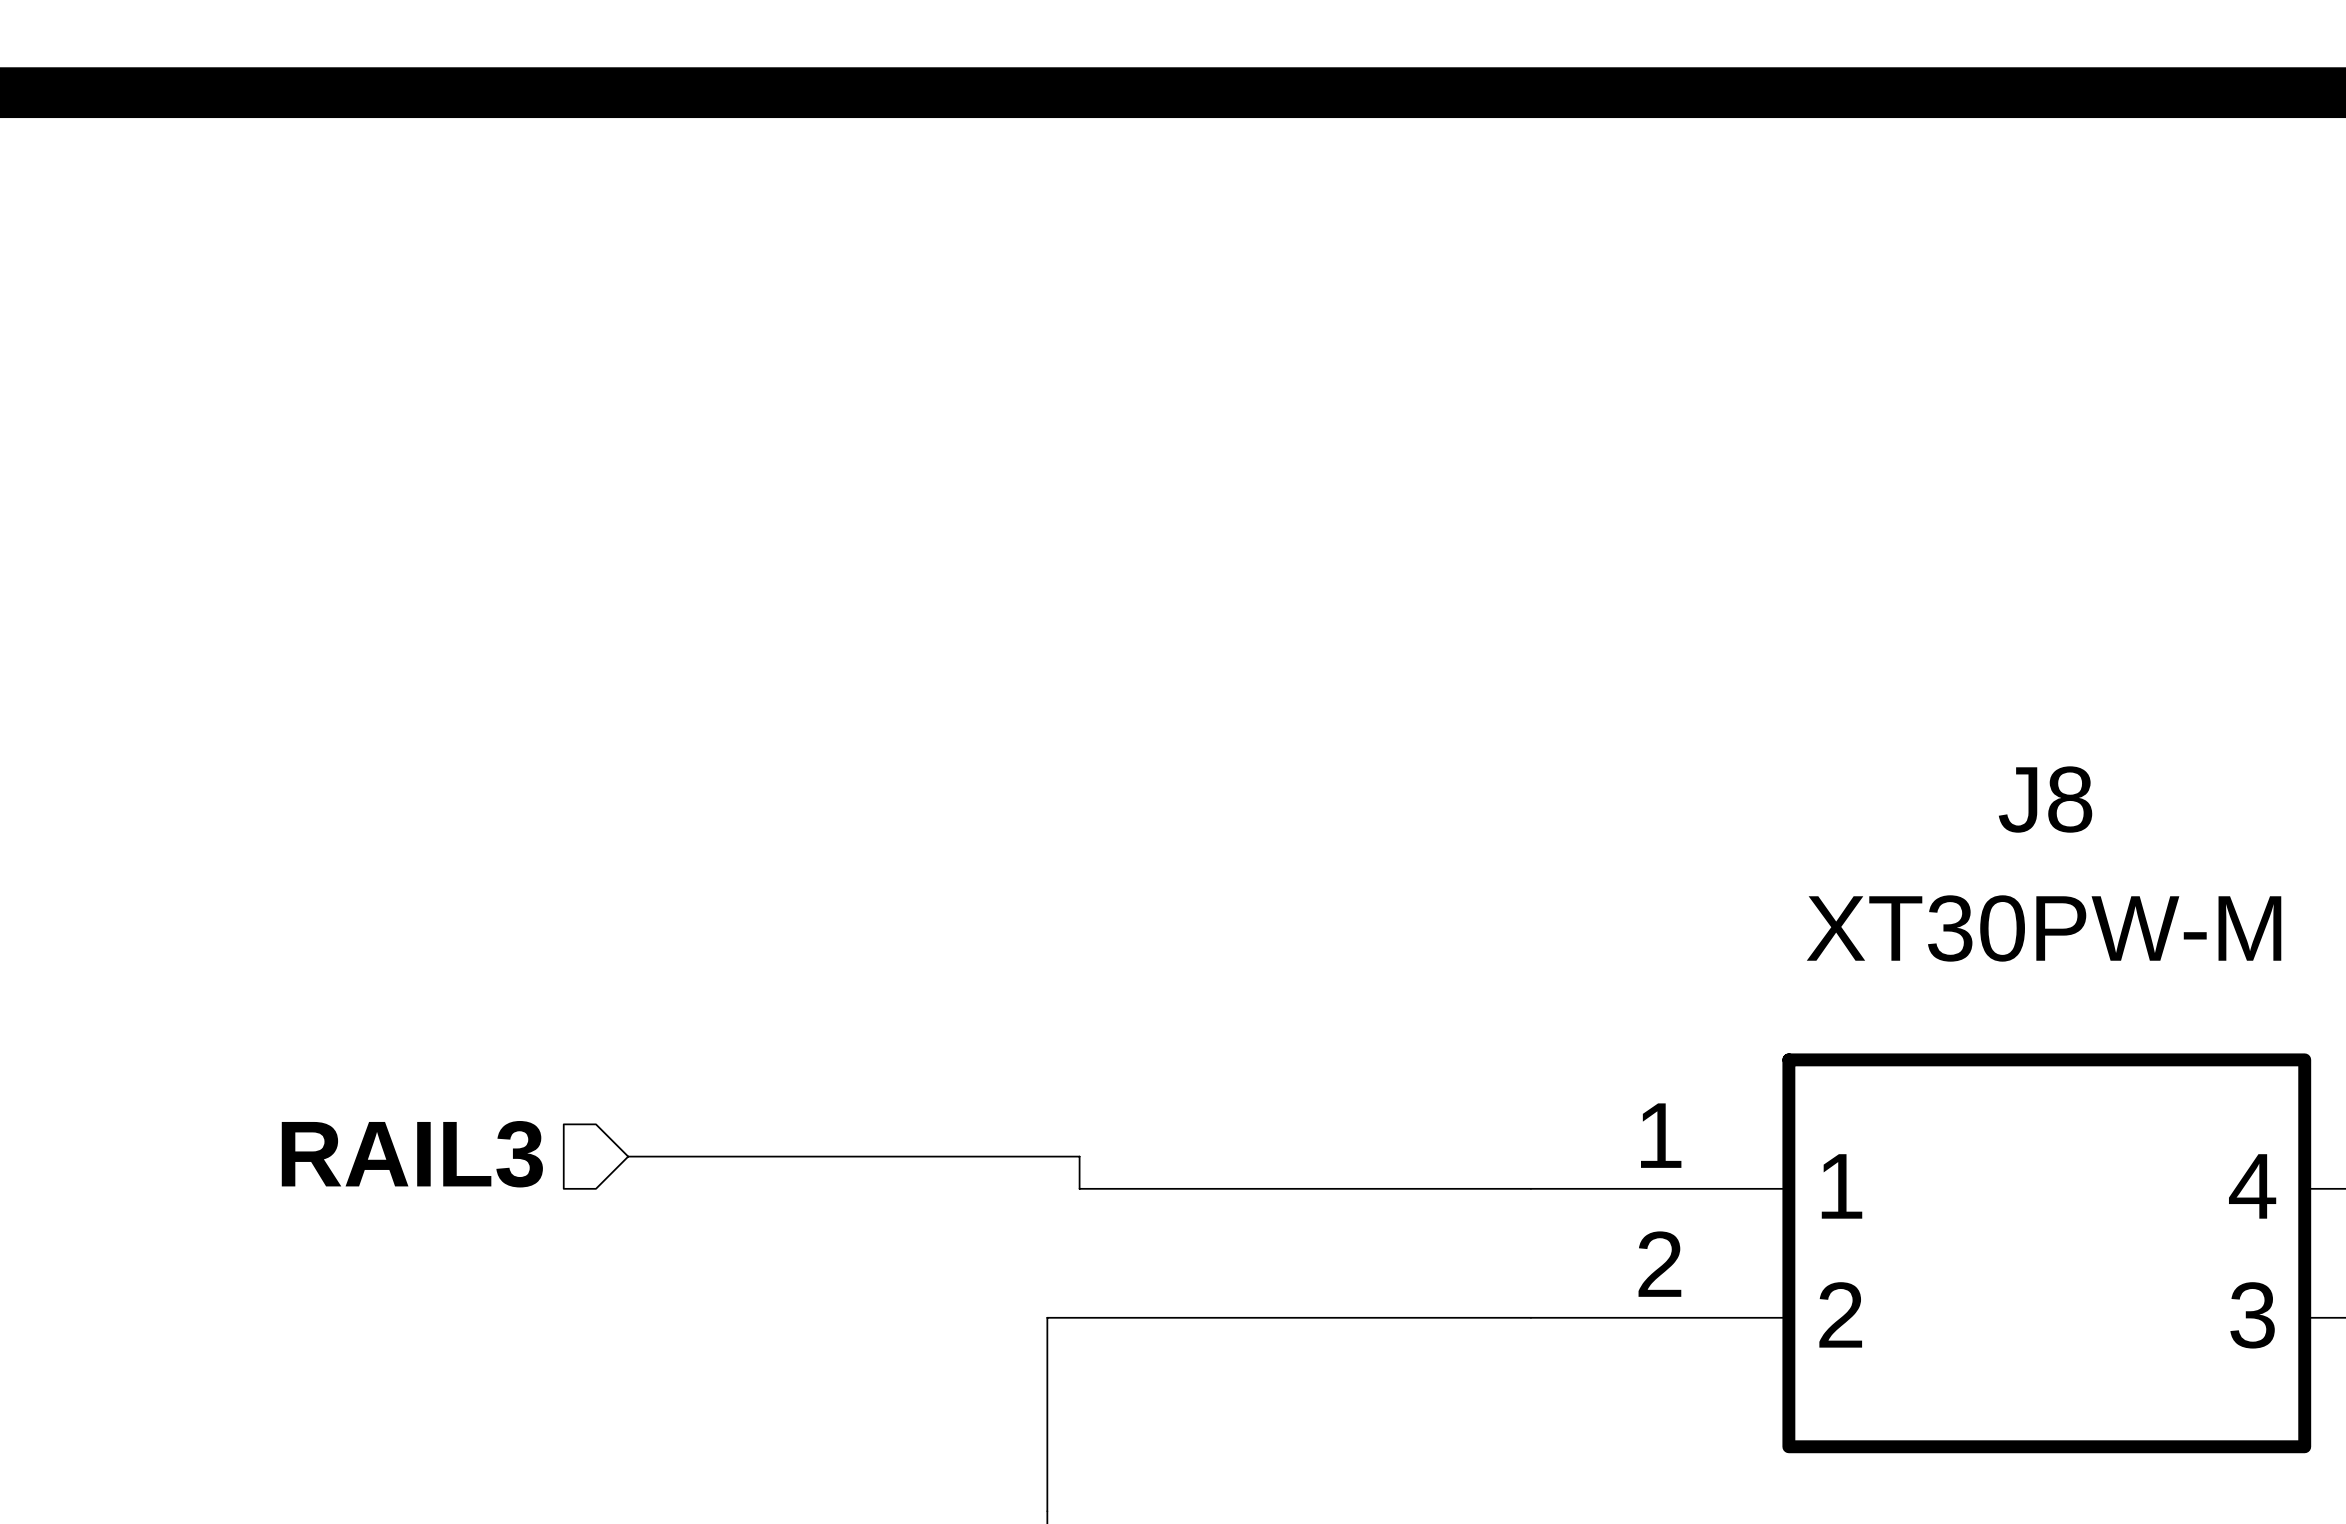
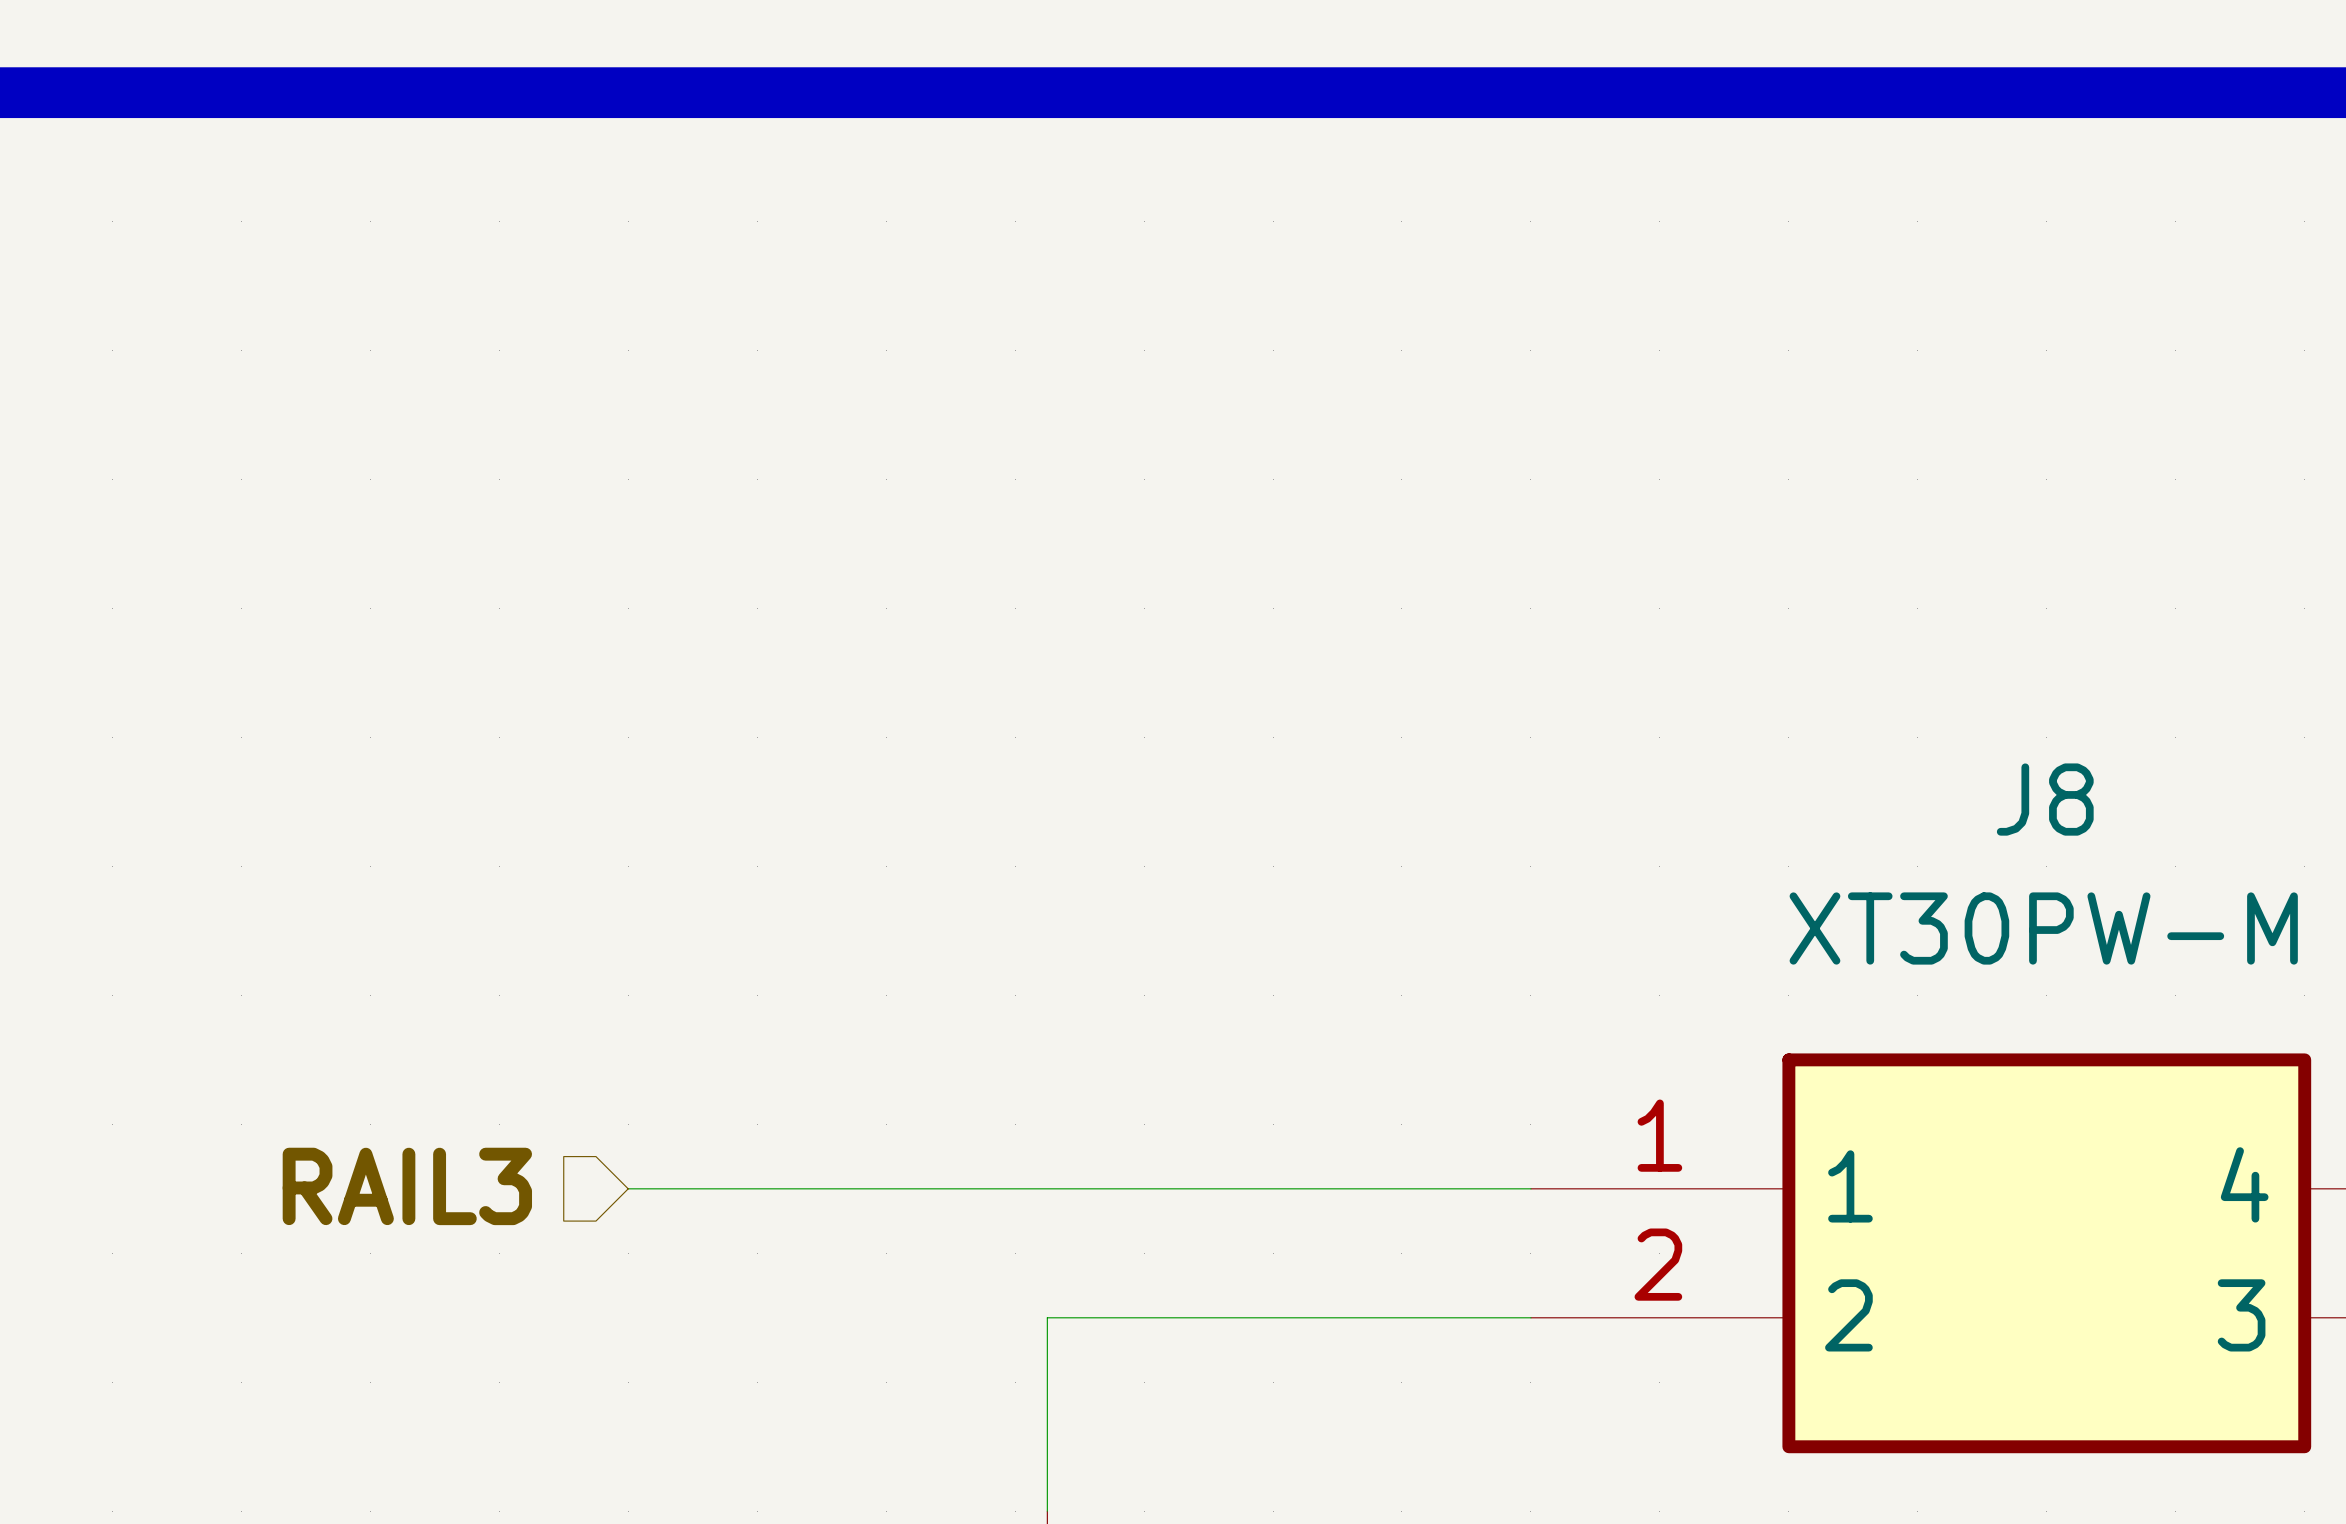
hierarchical label position: RAIL3 (412, 1154) -> RAIL3 (407, 1186)
wire: (628, 1156) (1079, 1156) (1079, 1188) -> (628, 1188) (1079, 1188)

